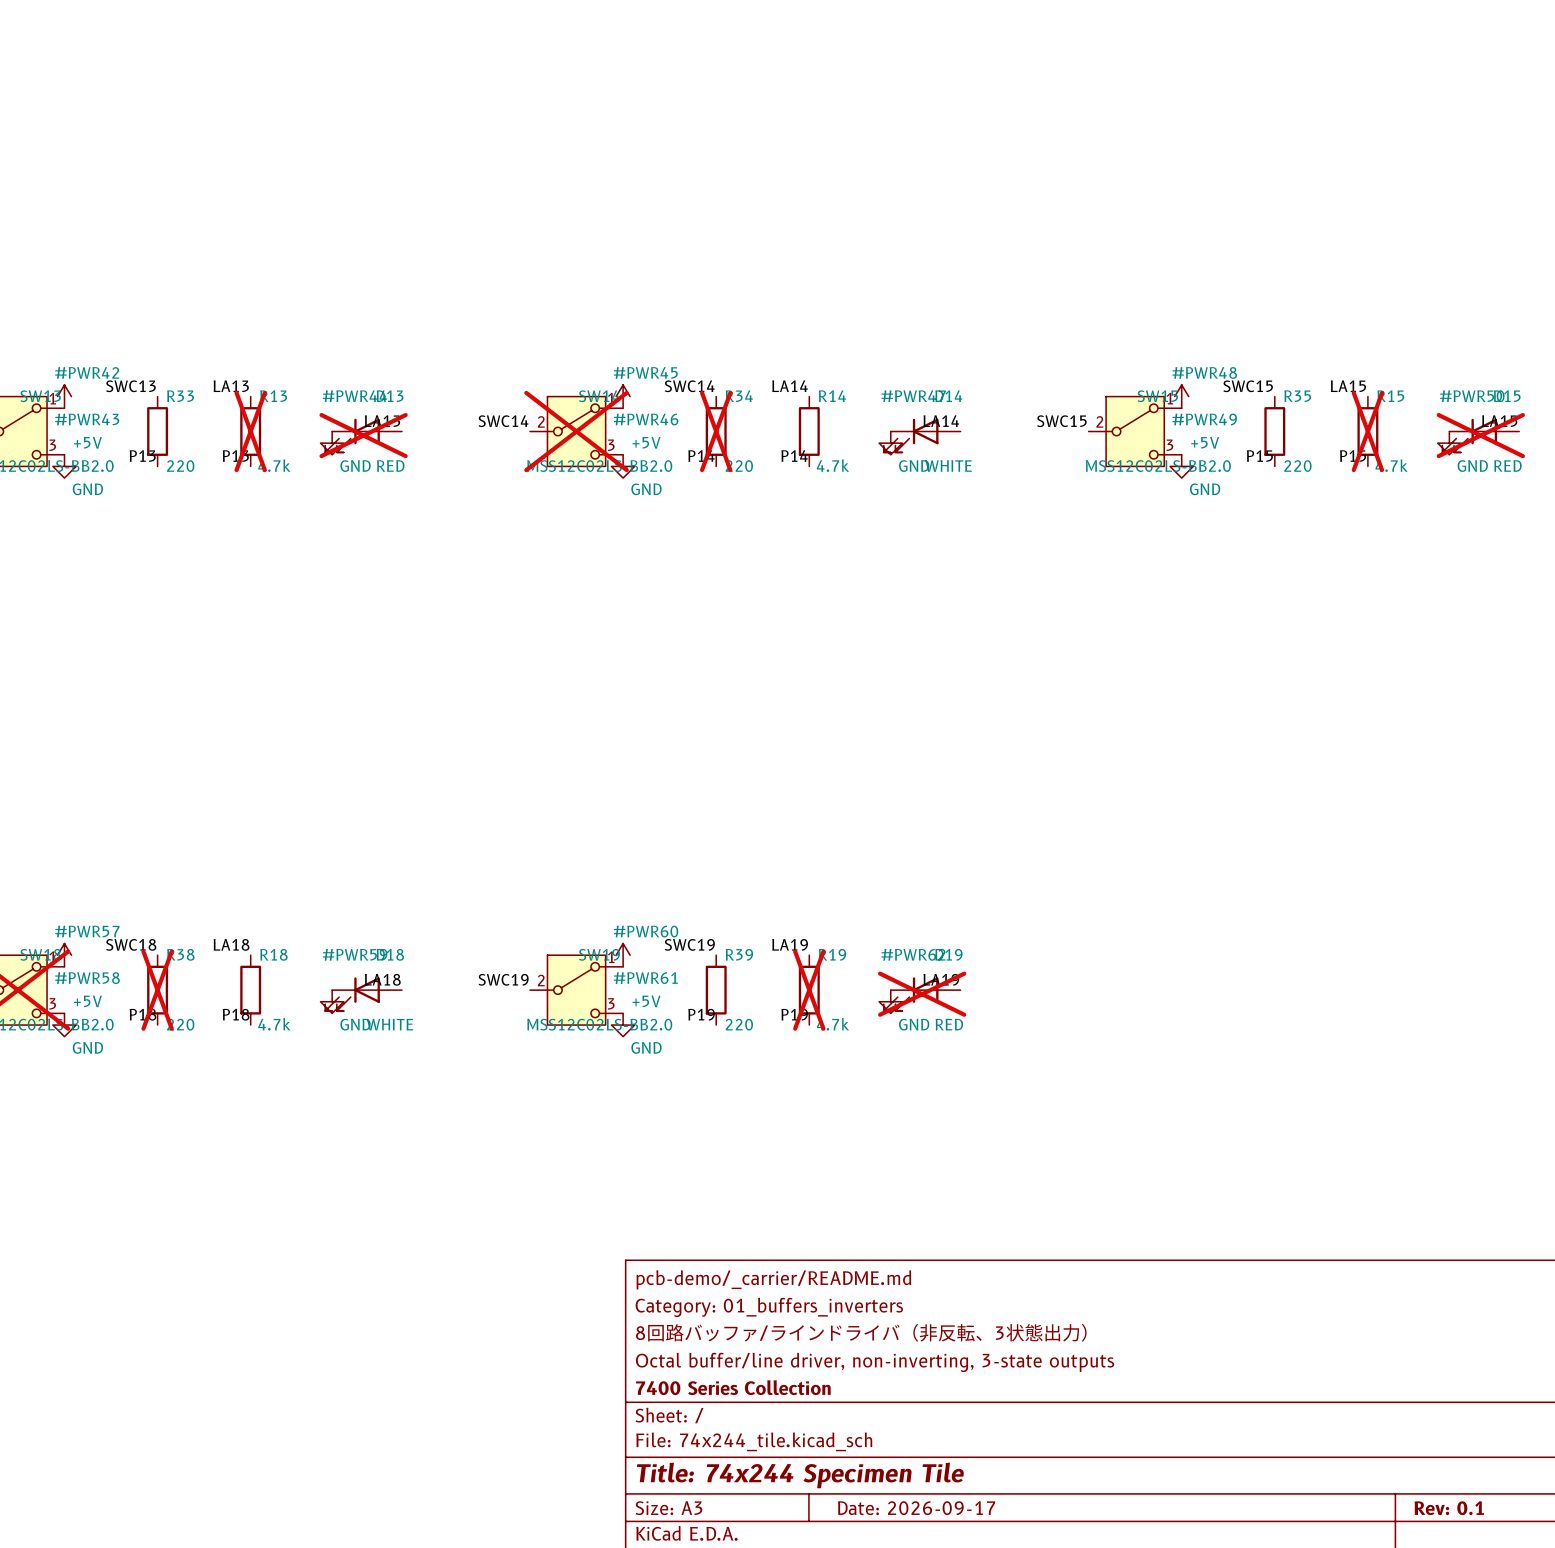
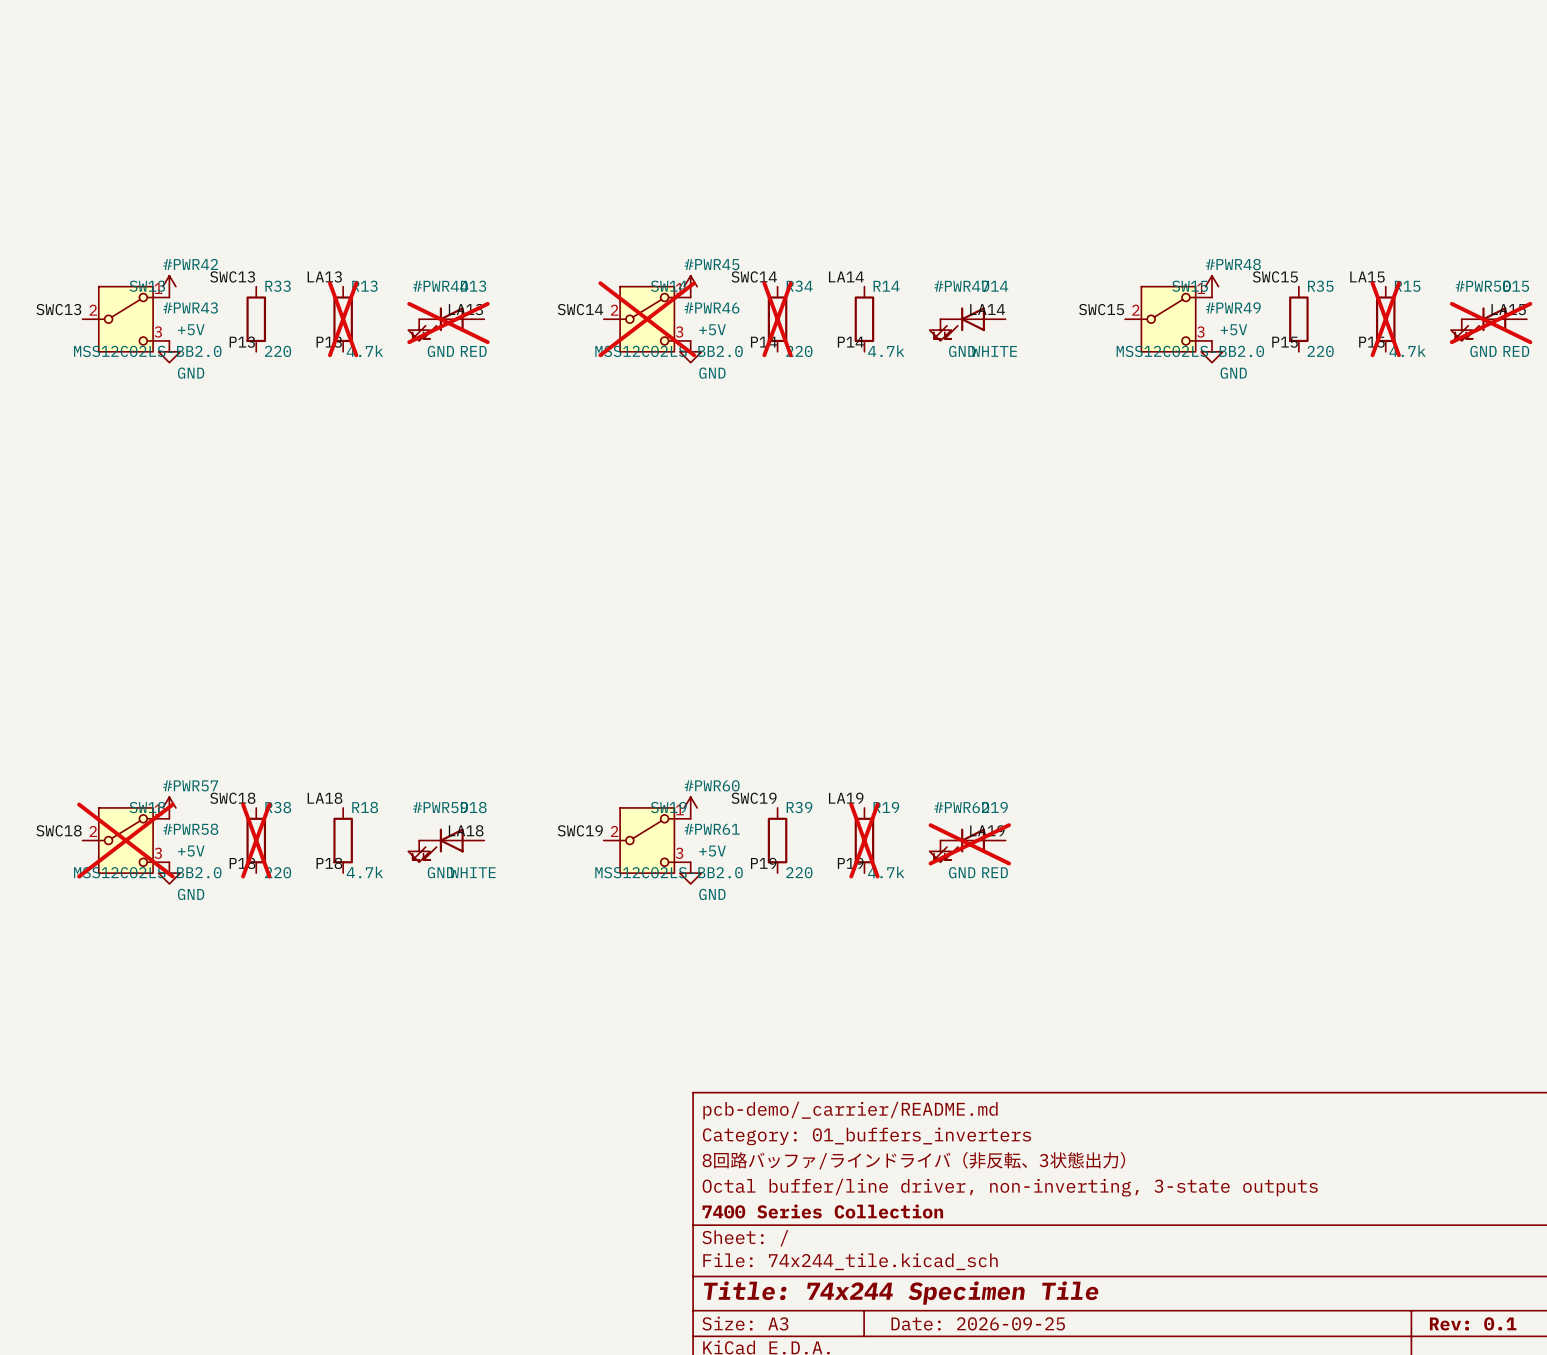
title block: Date: 2026-09-17 (916, 1508) -> Date: 2026-09-25 (978, 1323)

